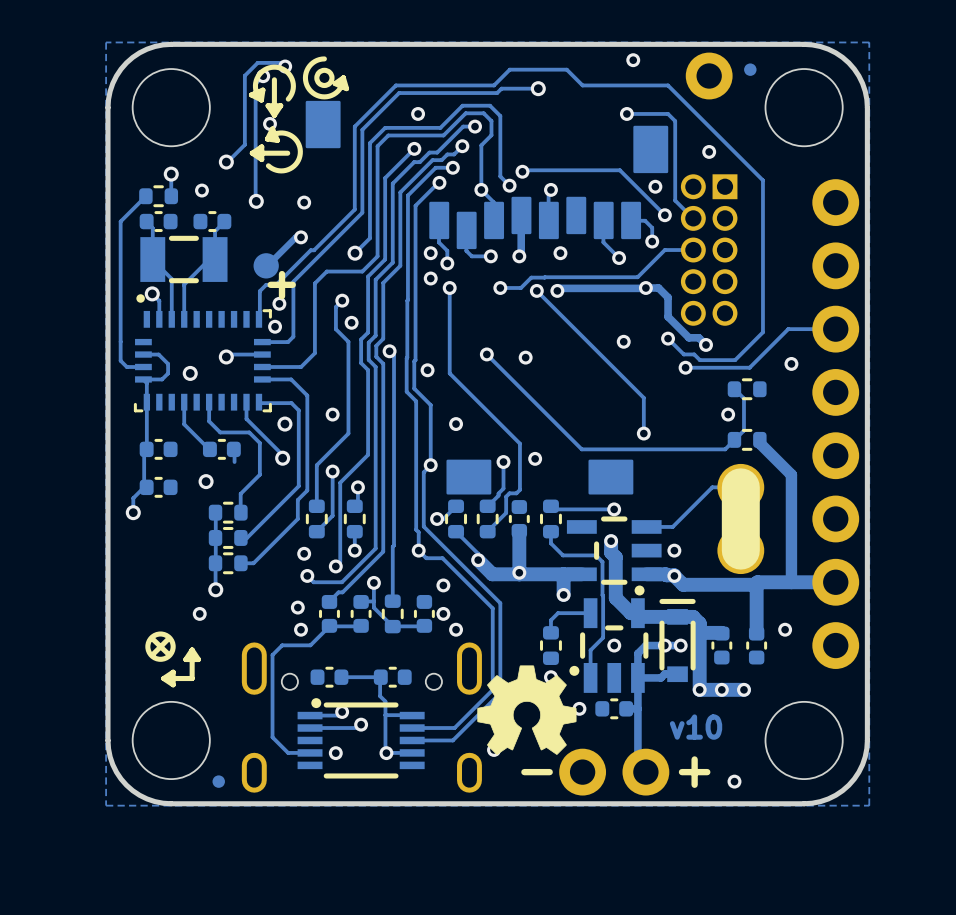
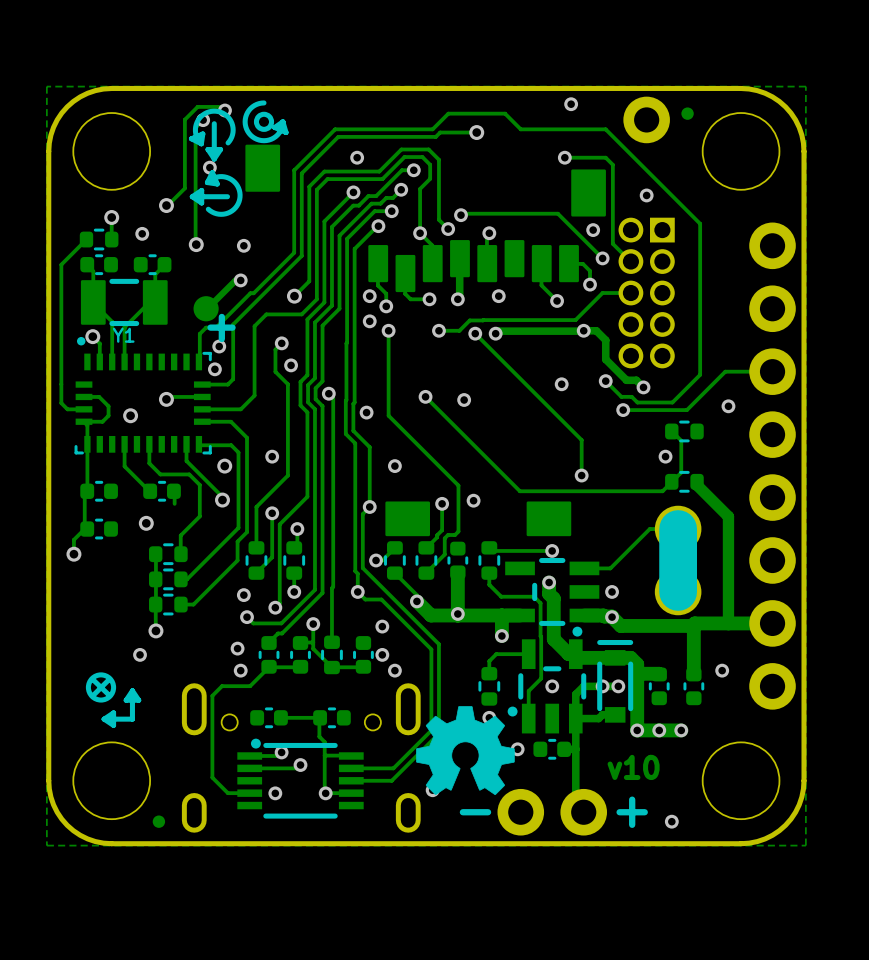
part: (183, 259) -> none
Y1: none -> (124, 302)

